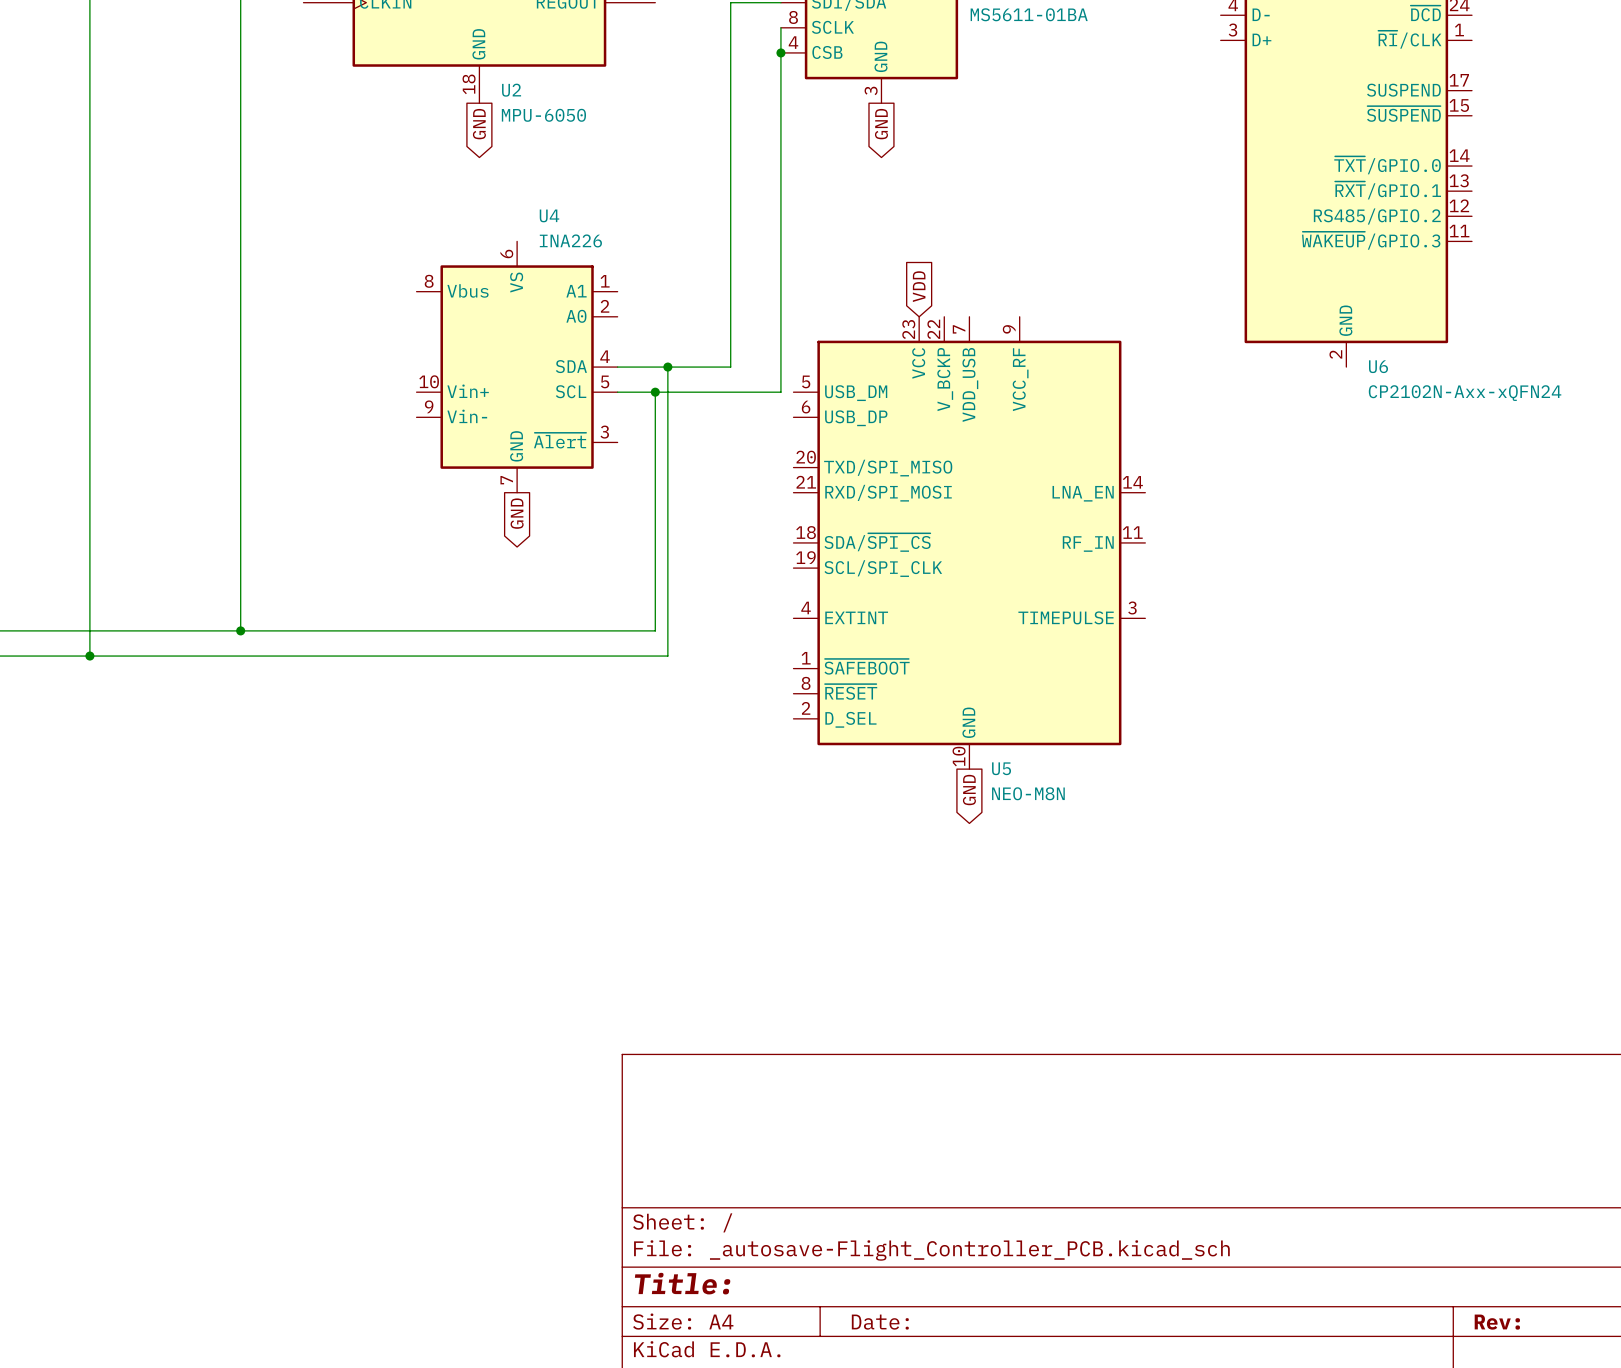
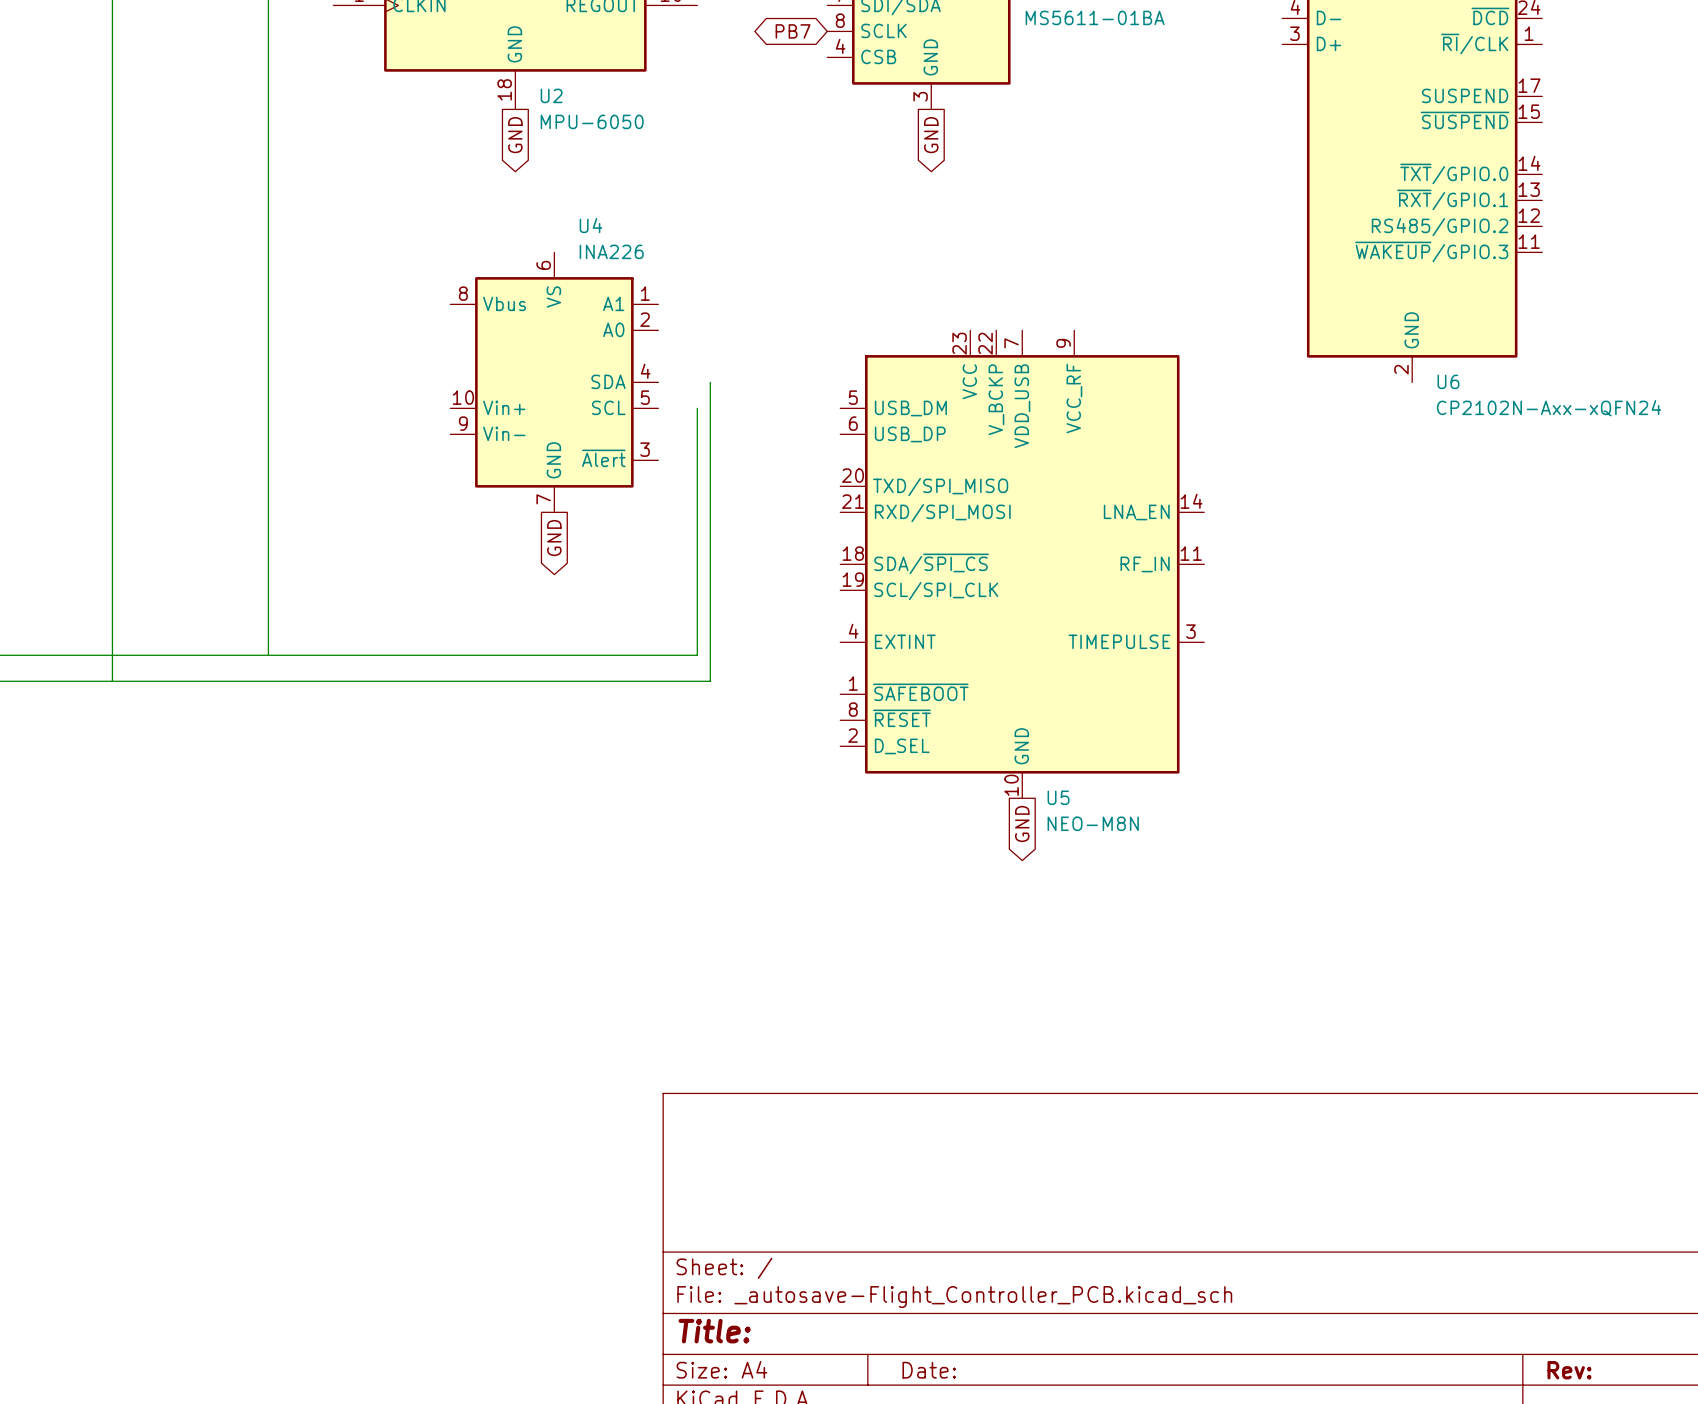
wire: (780, 2) (730, 2) (730, 367) (617, 367) -> none
global label: none -> PB7 (793, 31)
wire: (780, 27) (780, 392) (617, 392) -> none
junction: (780, 52) -> none
global label: VDD (919, 286) -> none
junction: (667, 367) -> none
junction: (655, 392) -> none
junction: (240, 630) -> none
junction: (89, 656) -> none

